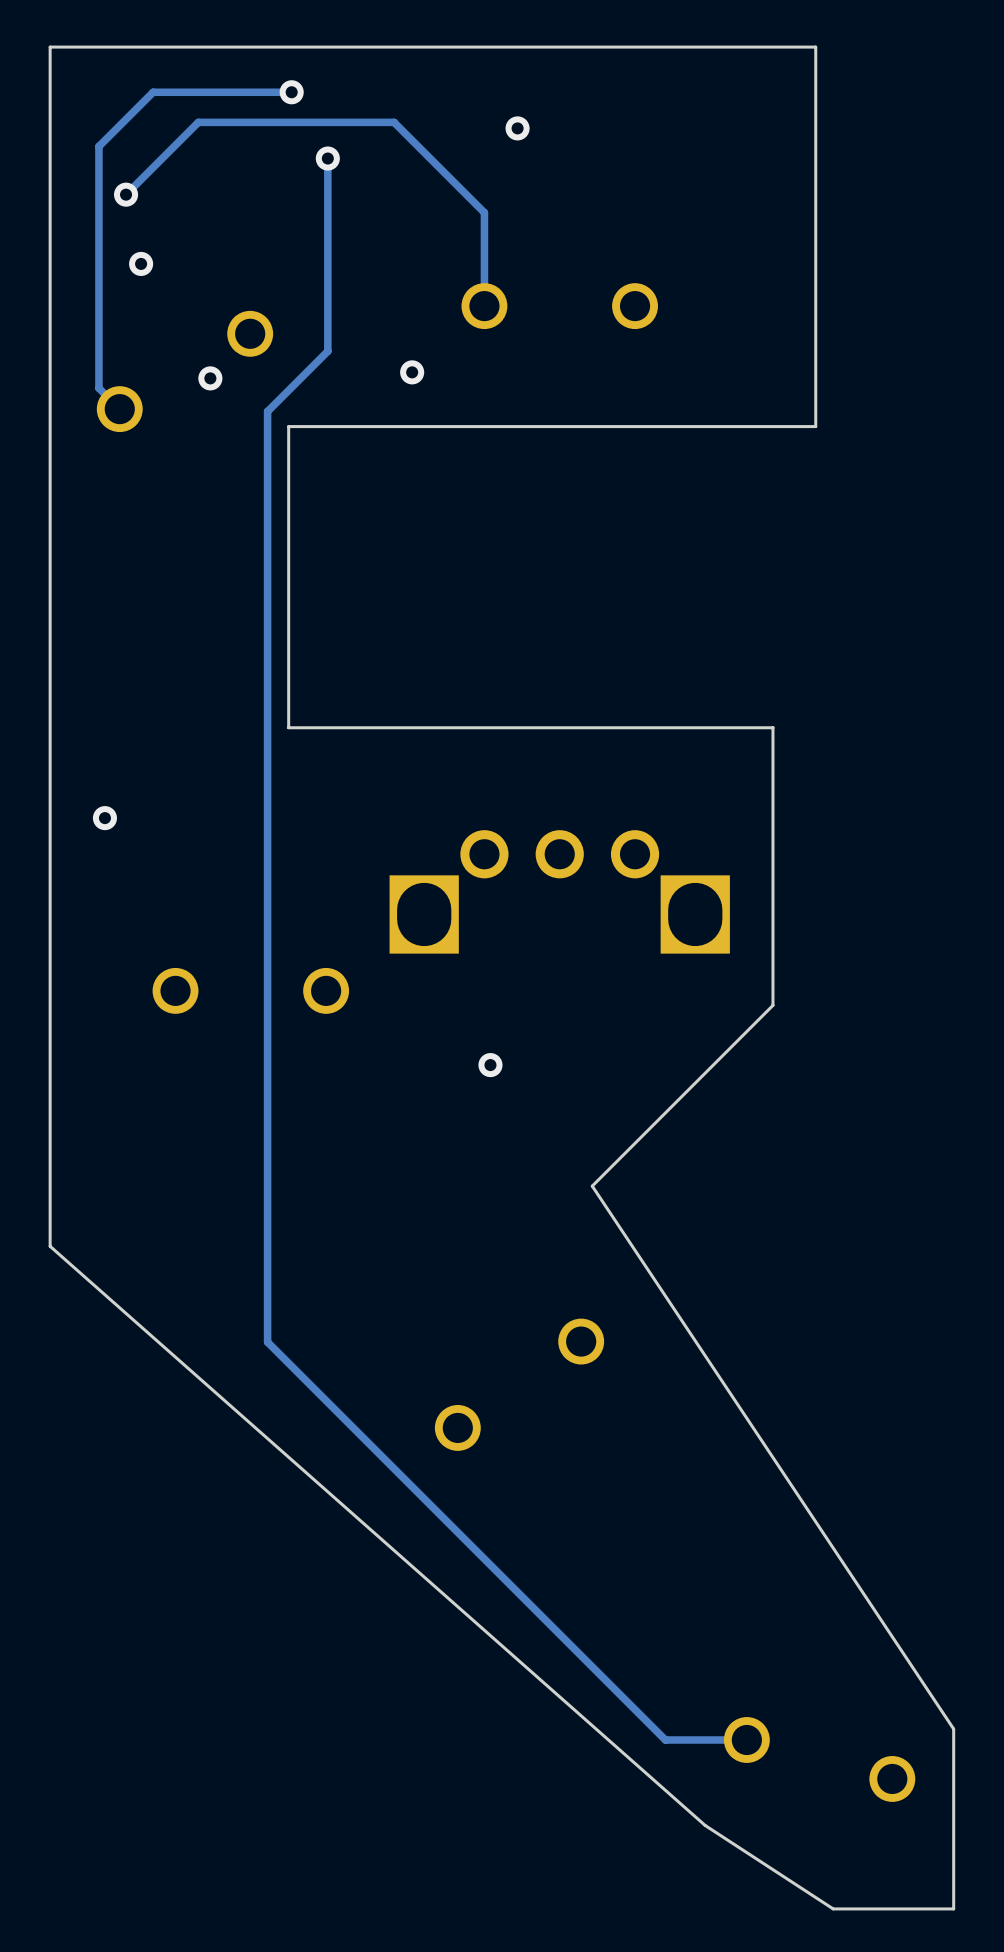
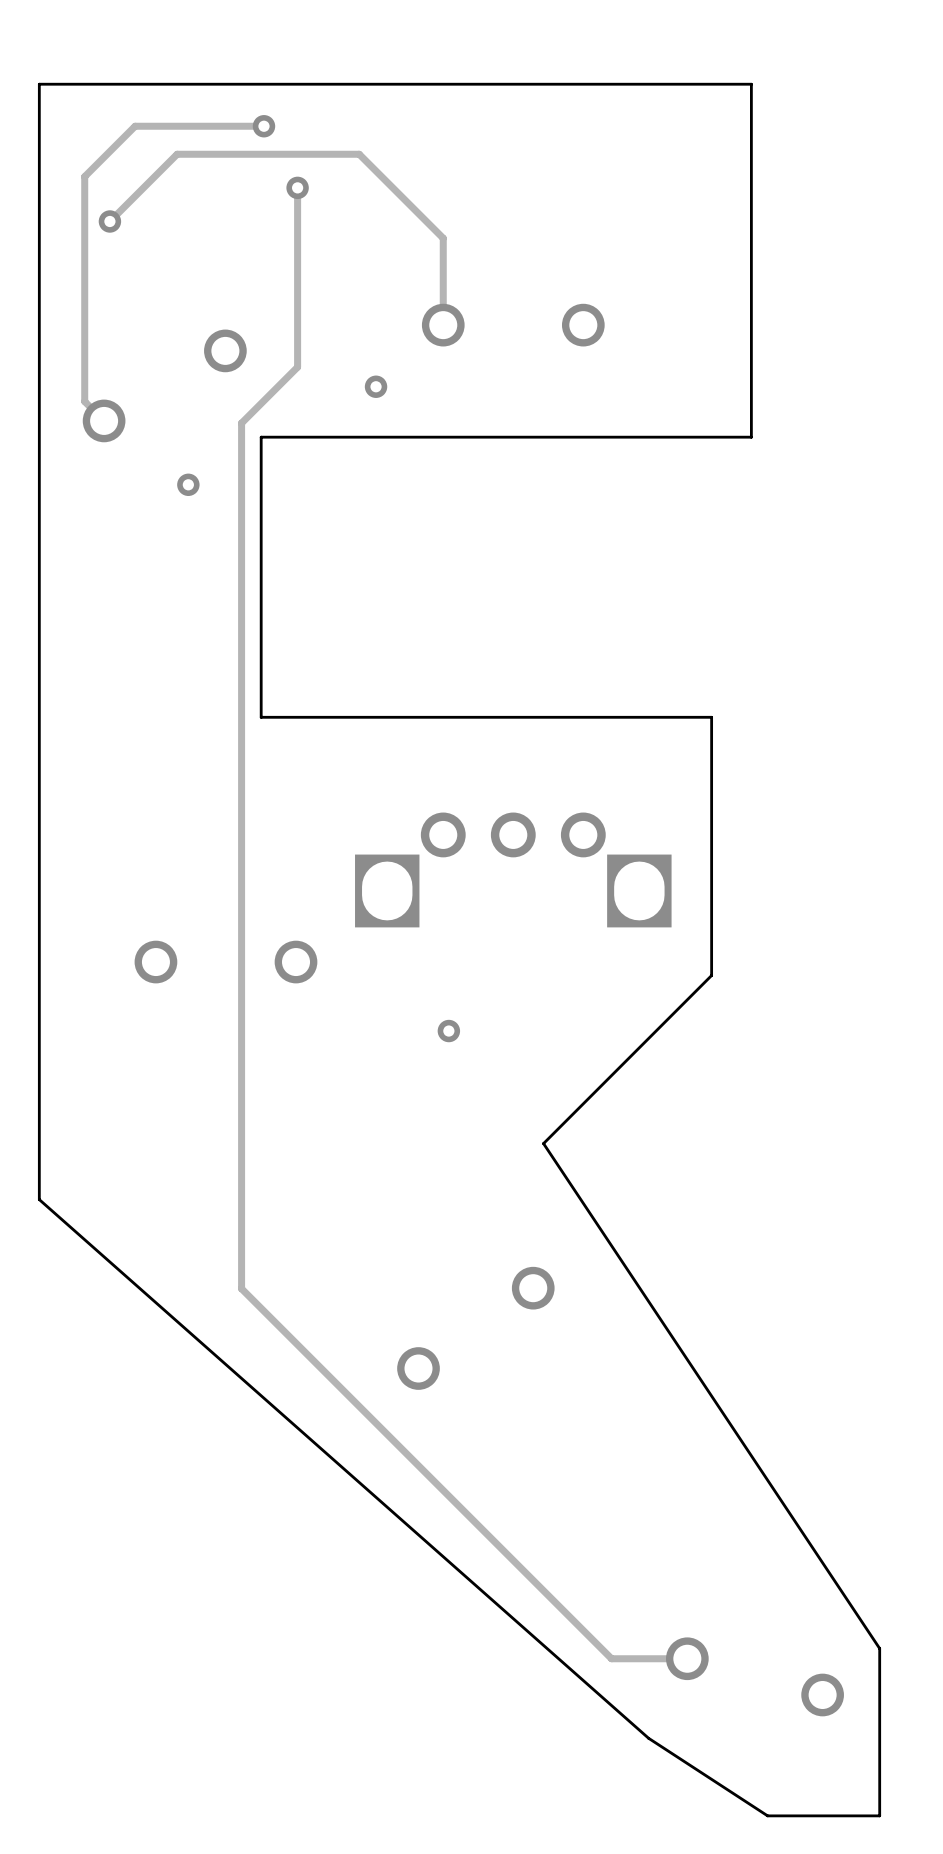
via: (517, 128) -> none
via: (141, 263) -> none
via position: (210, 378) -> (188, 484)
via: (104, 818) -> none

